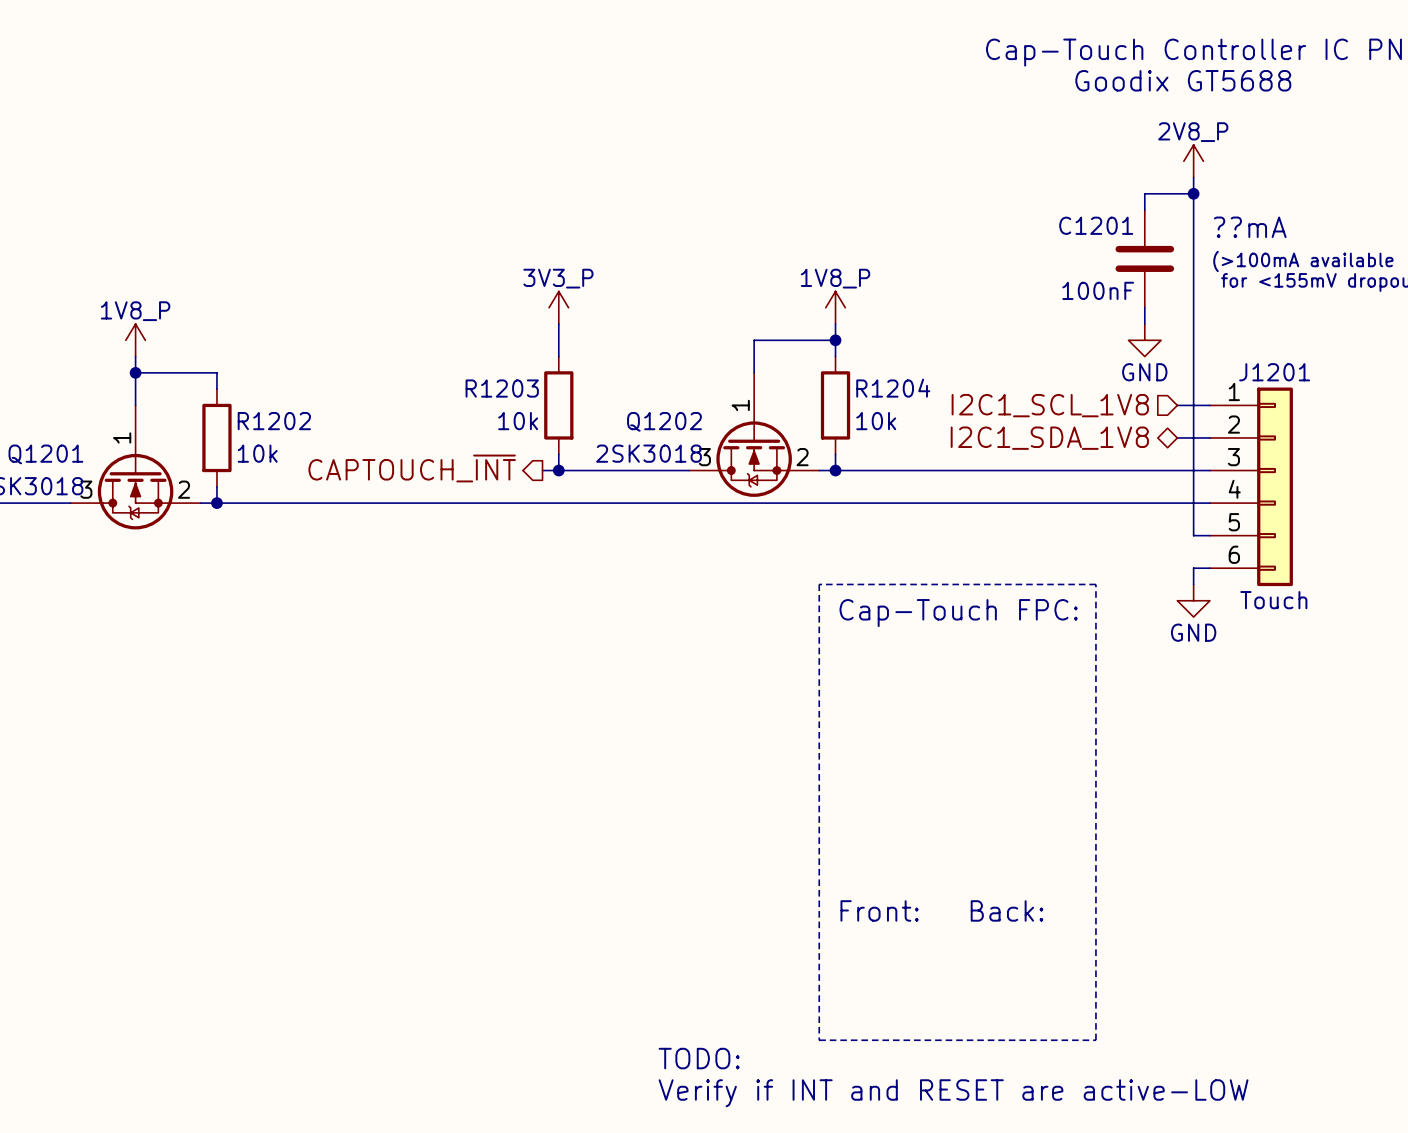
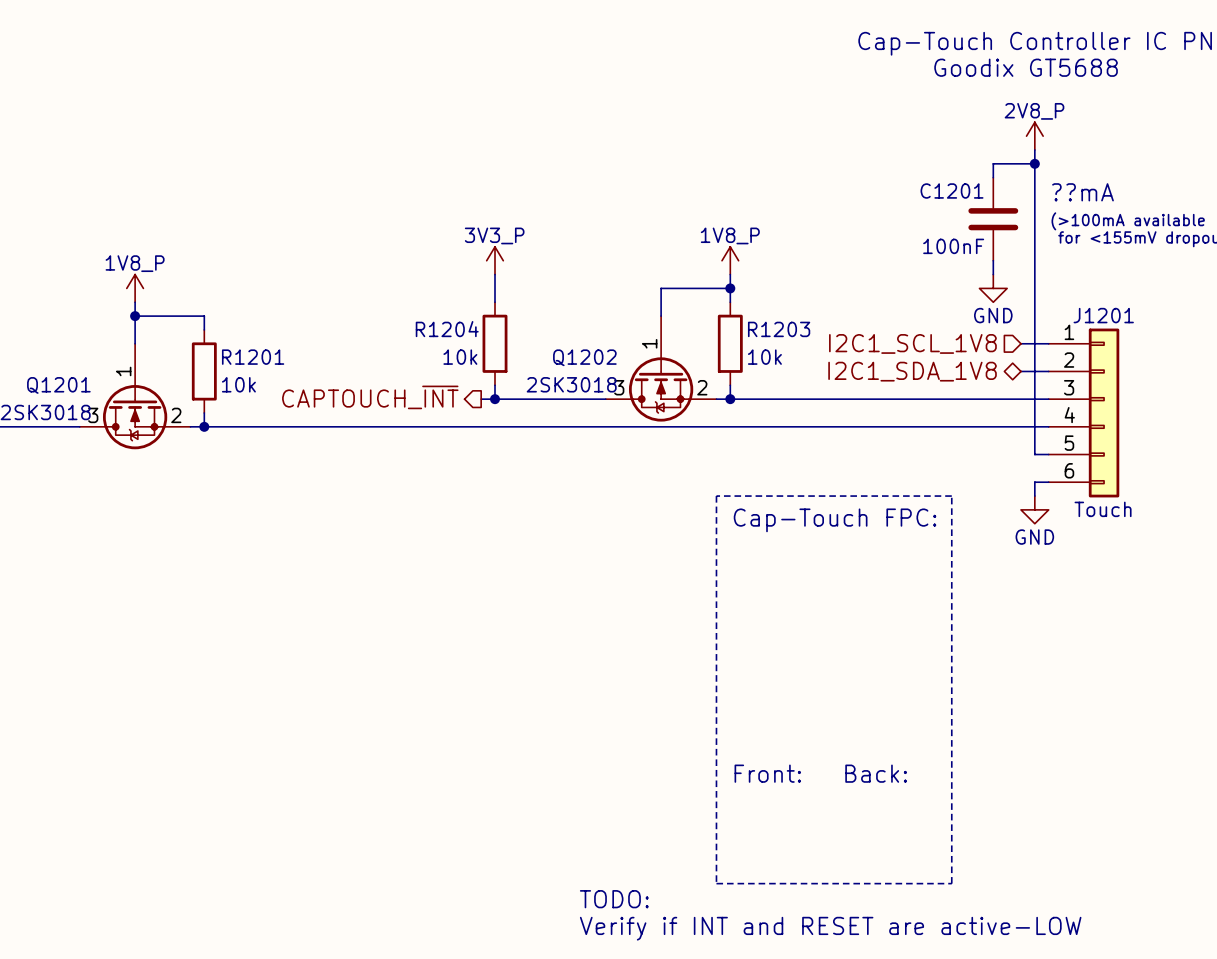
R1203 name: R1203 (502, 388) -> R1204 (447, 329)
R1204 name: R1204 (893, 388) -> R1203 (779, 329)
R1202 name: R1202 (274, 421) -> R1201 (253, 357)

